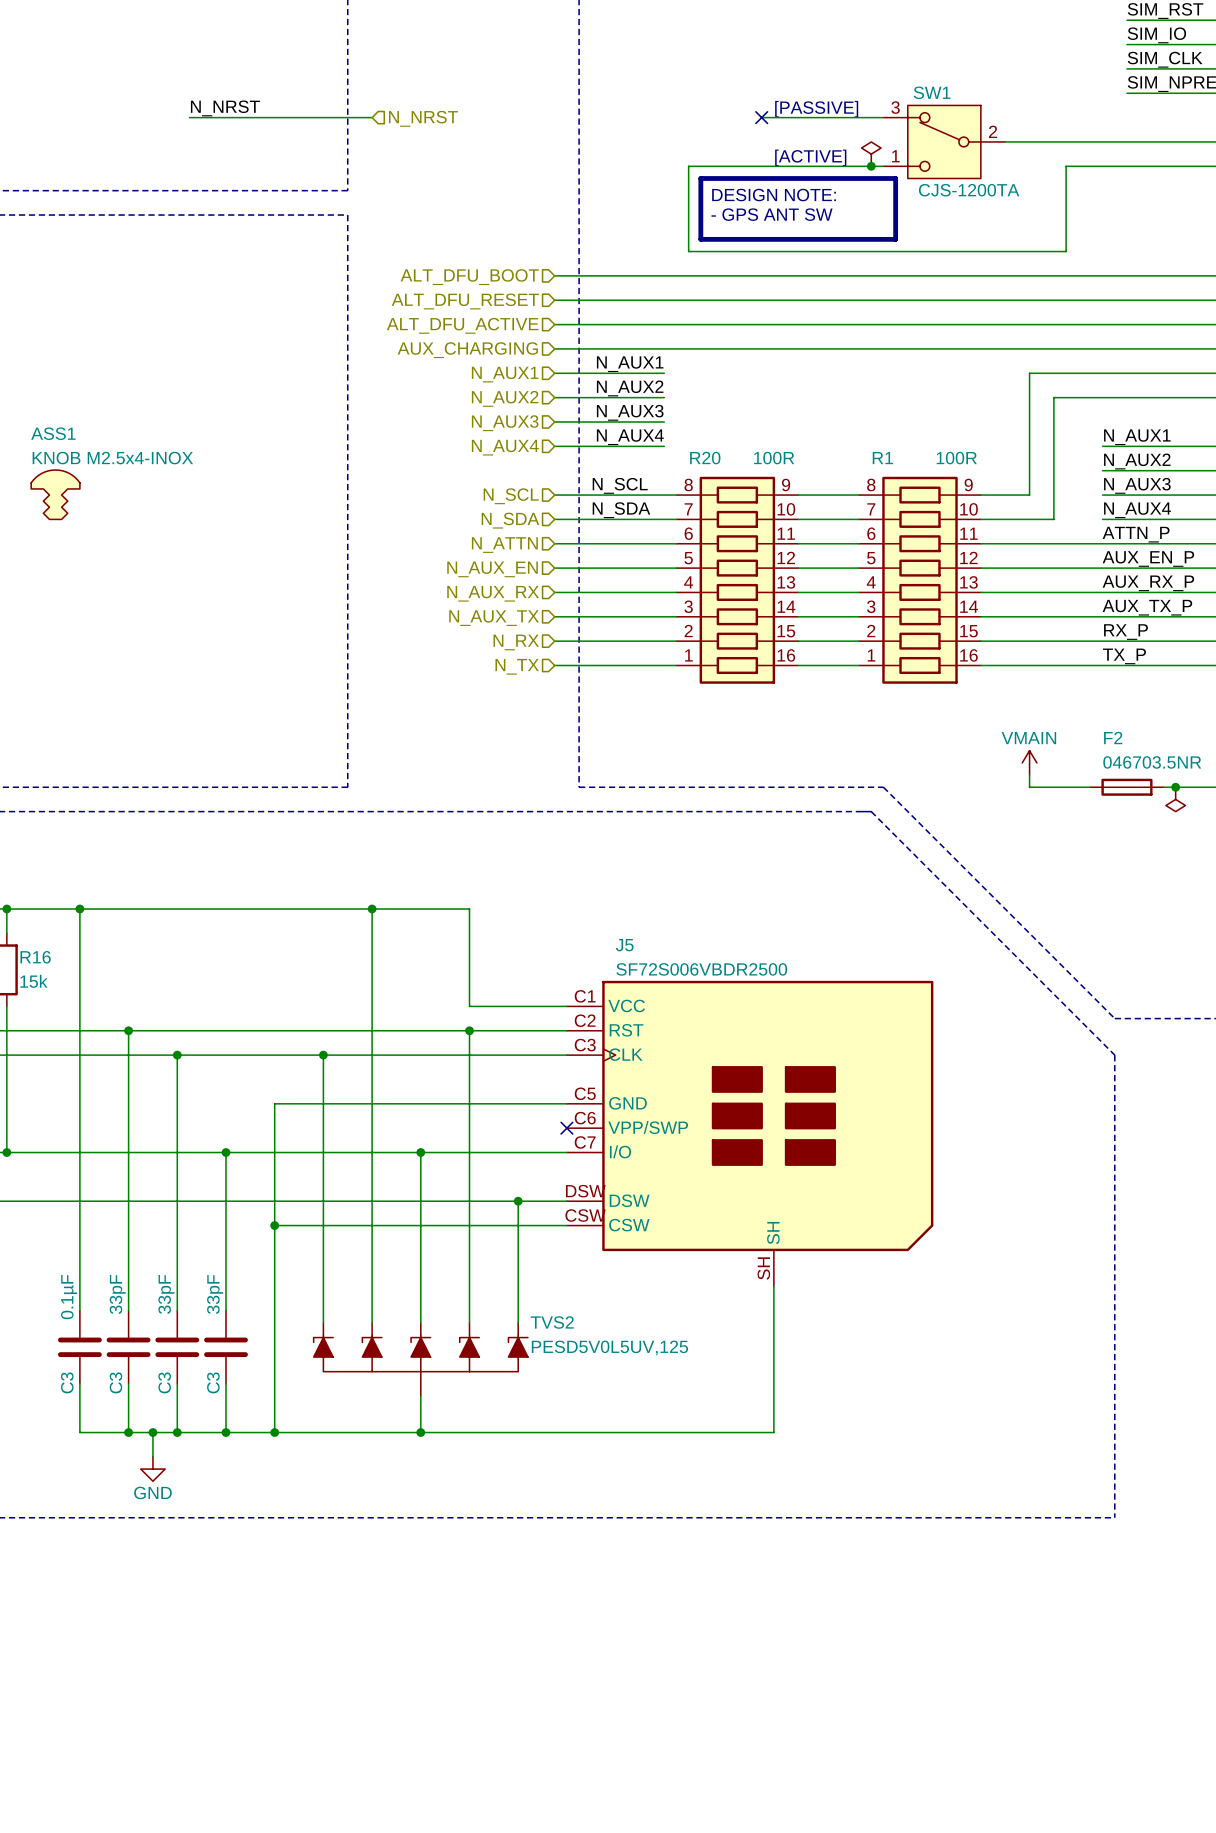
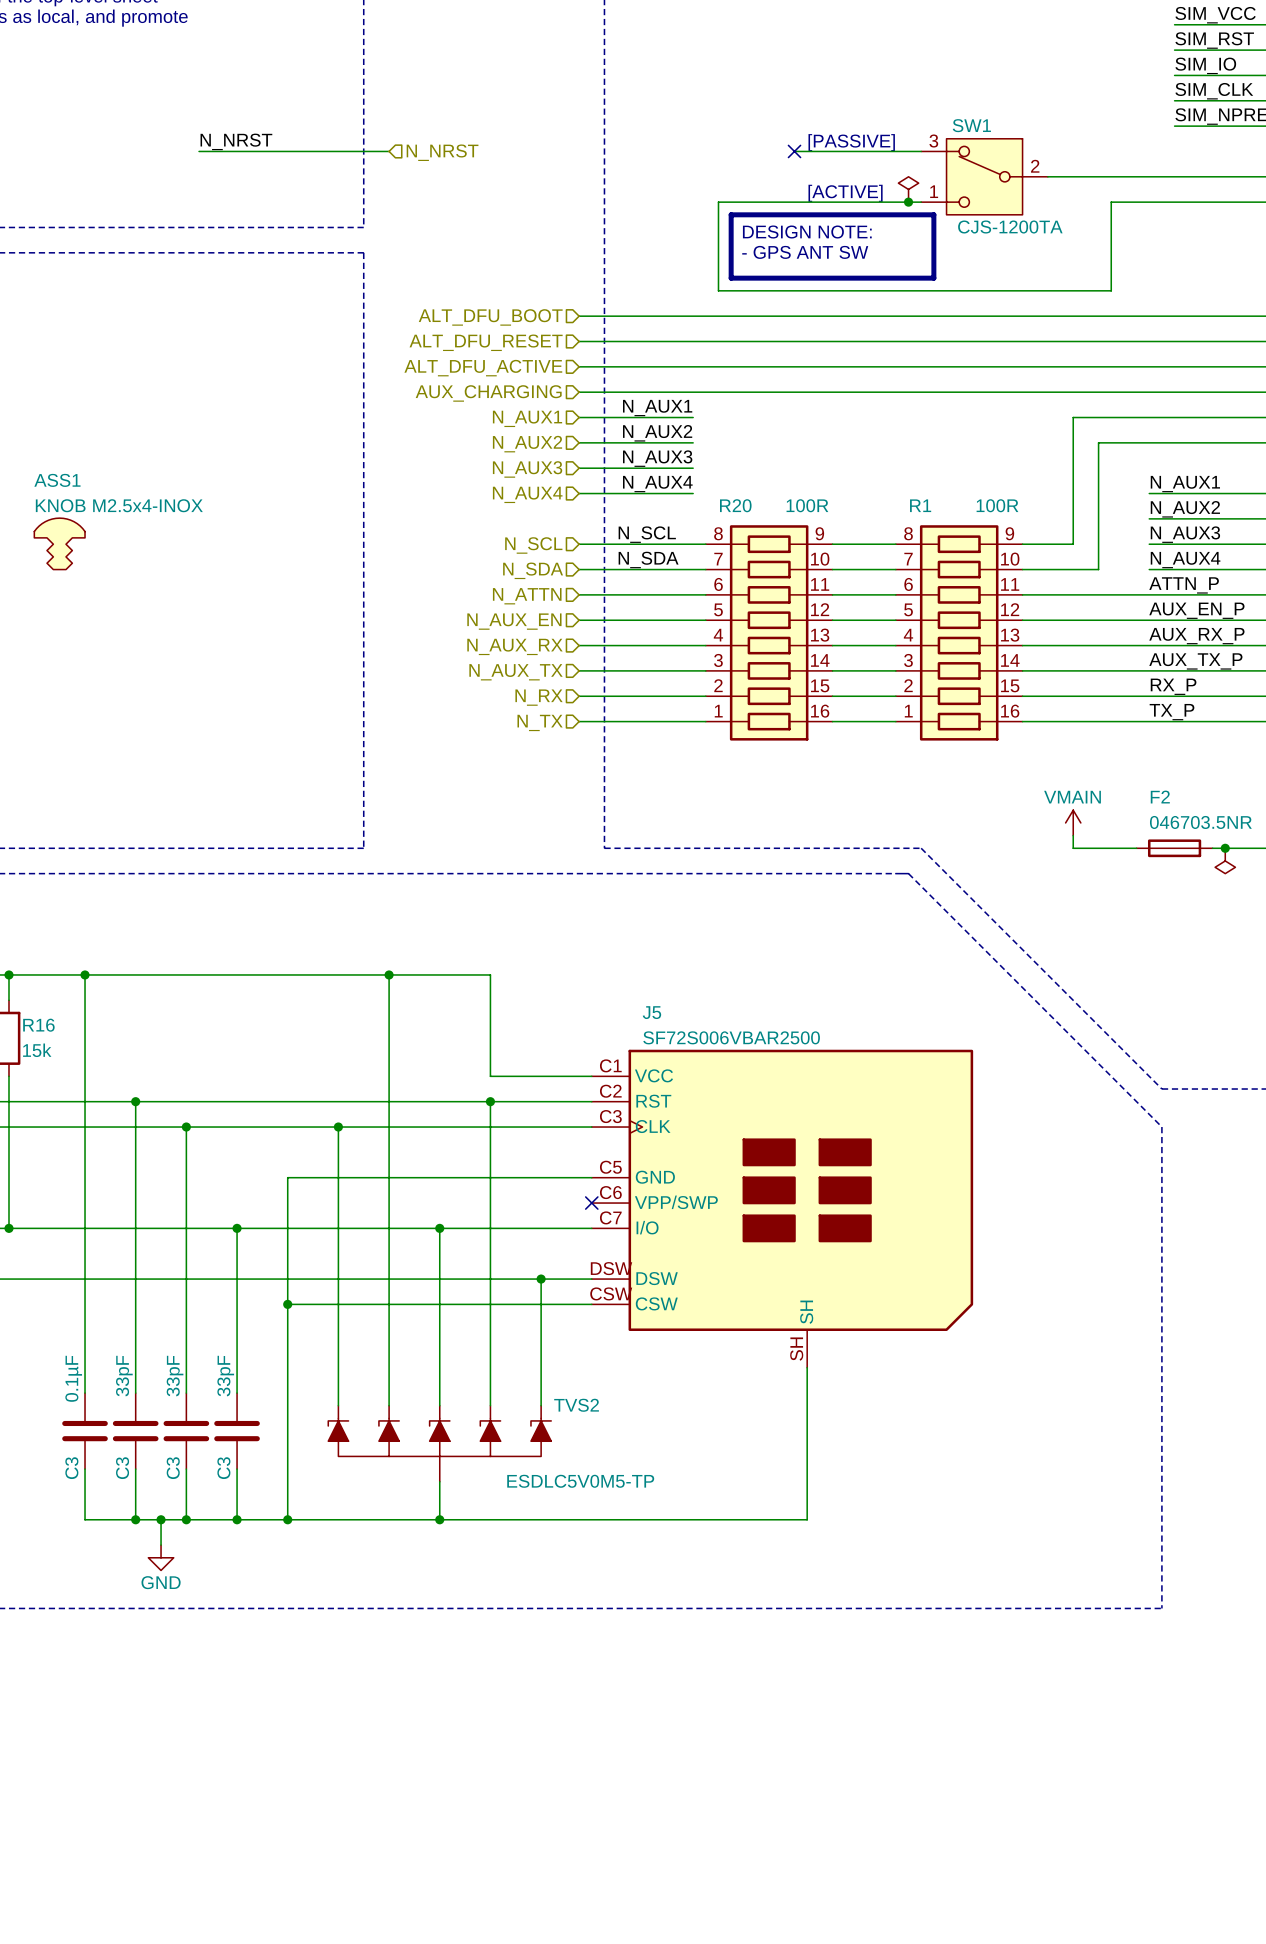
J5 value: SF72S006VBDR2500 (701, 969) -> SF72S006VBAR2500 (731, 1037)
TVS2 value: PESD5V0L5UV,125 (609, 1347) -> ESDLC5V0M5-TP (580, 1481)

